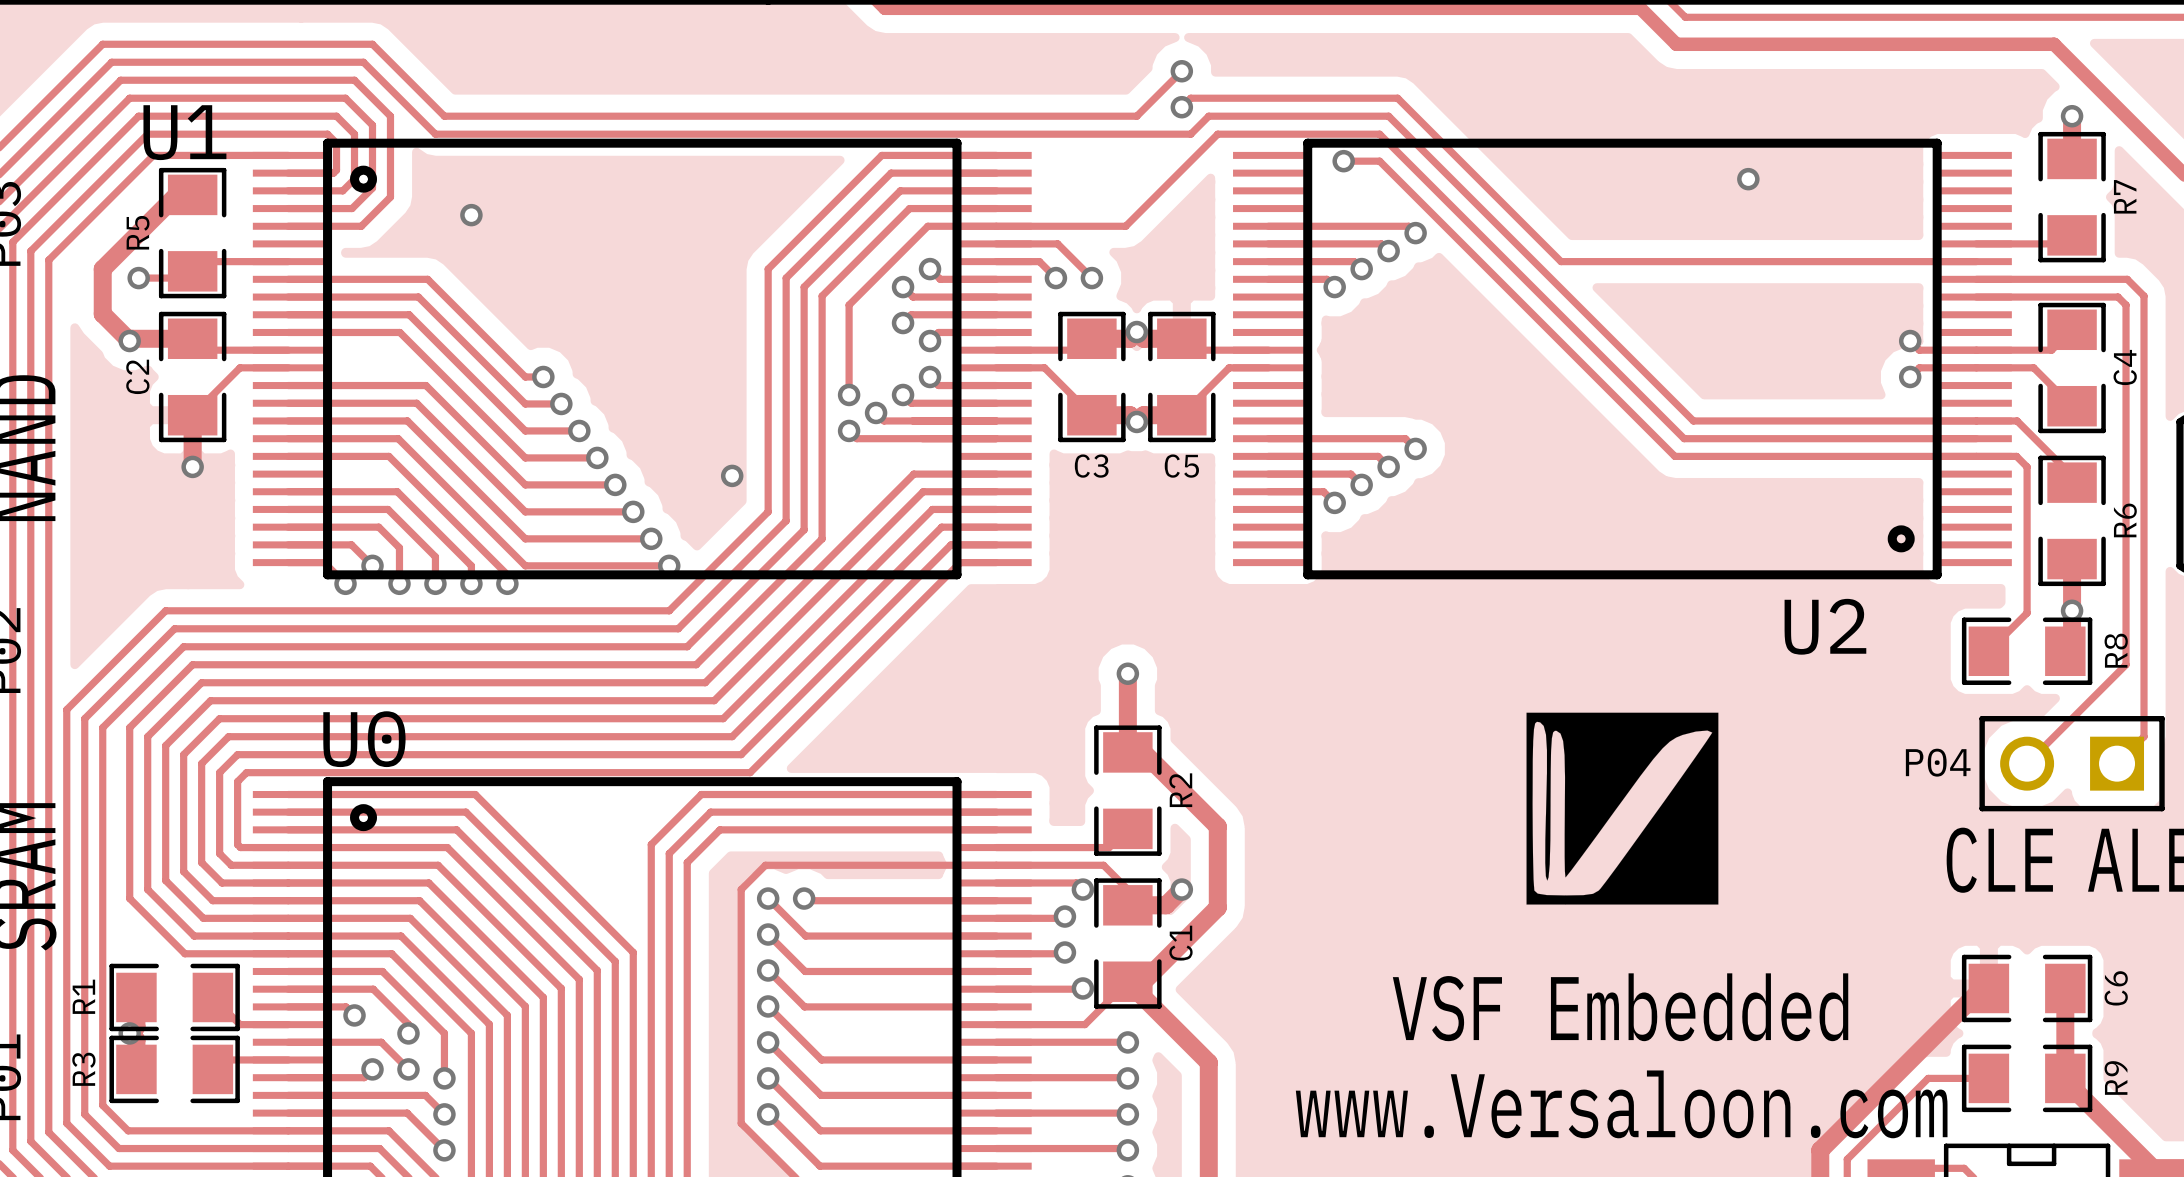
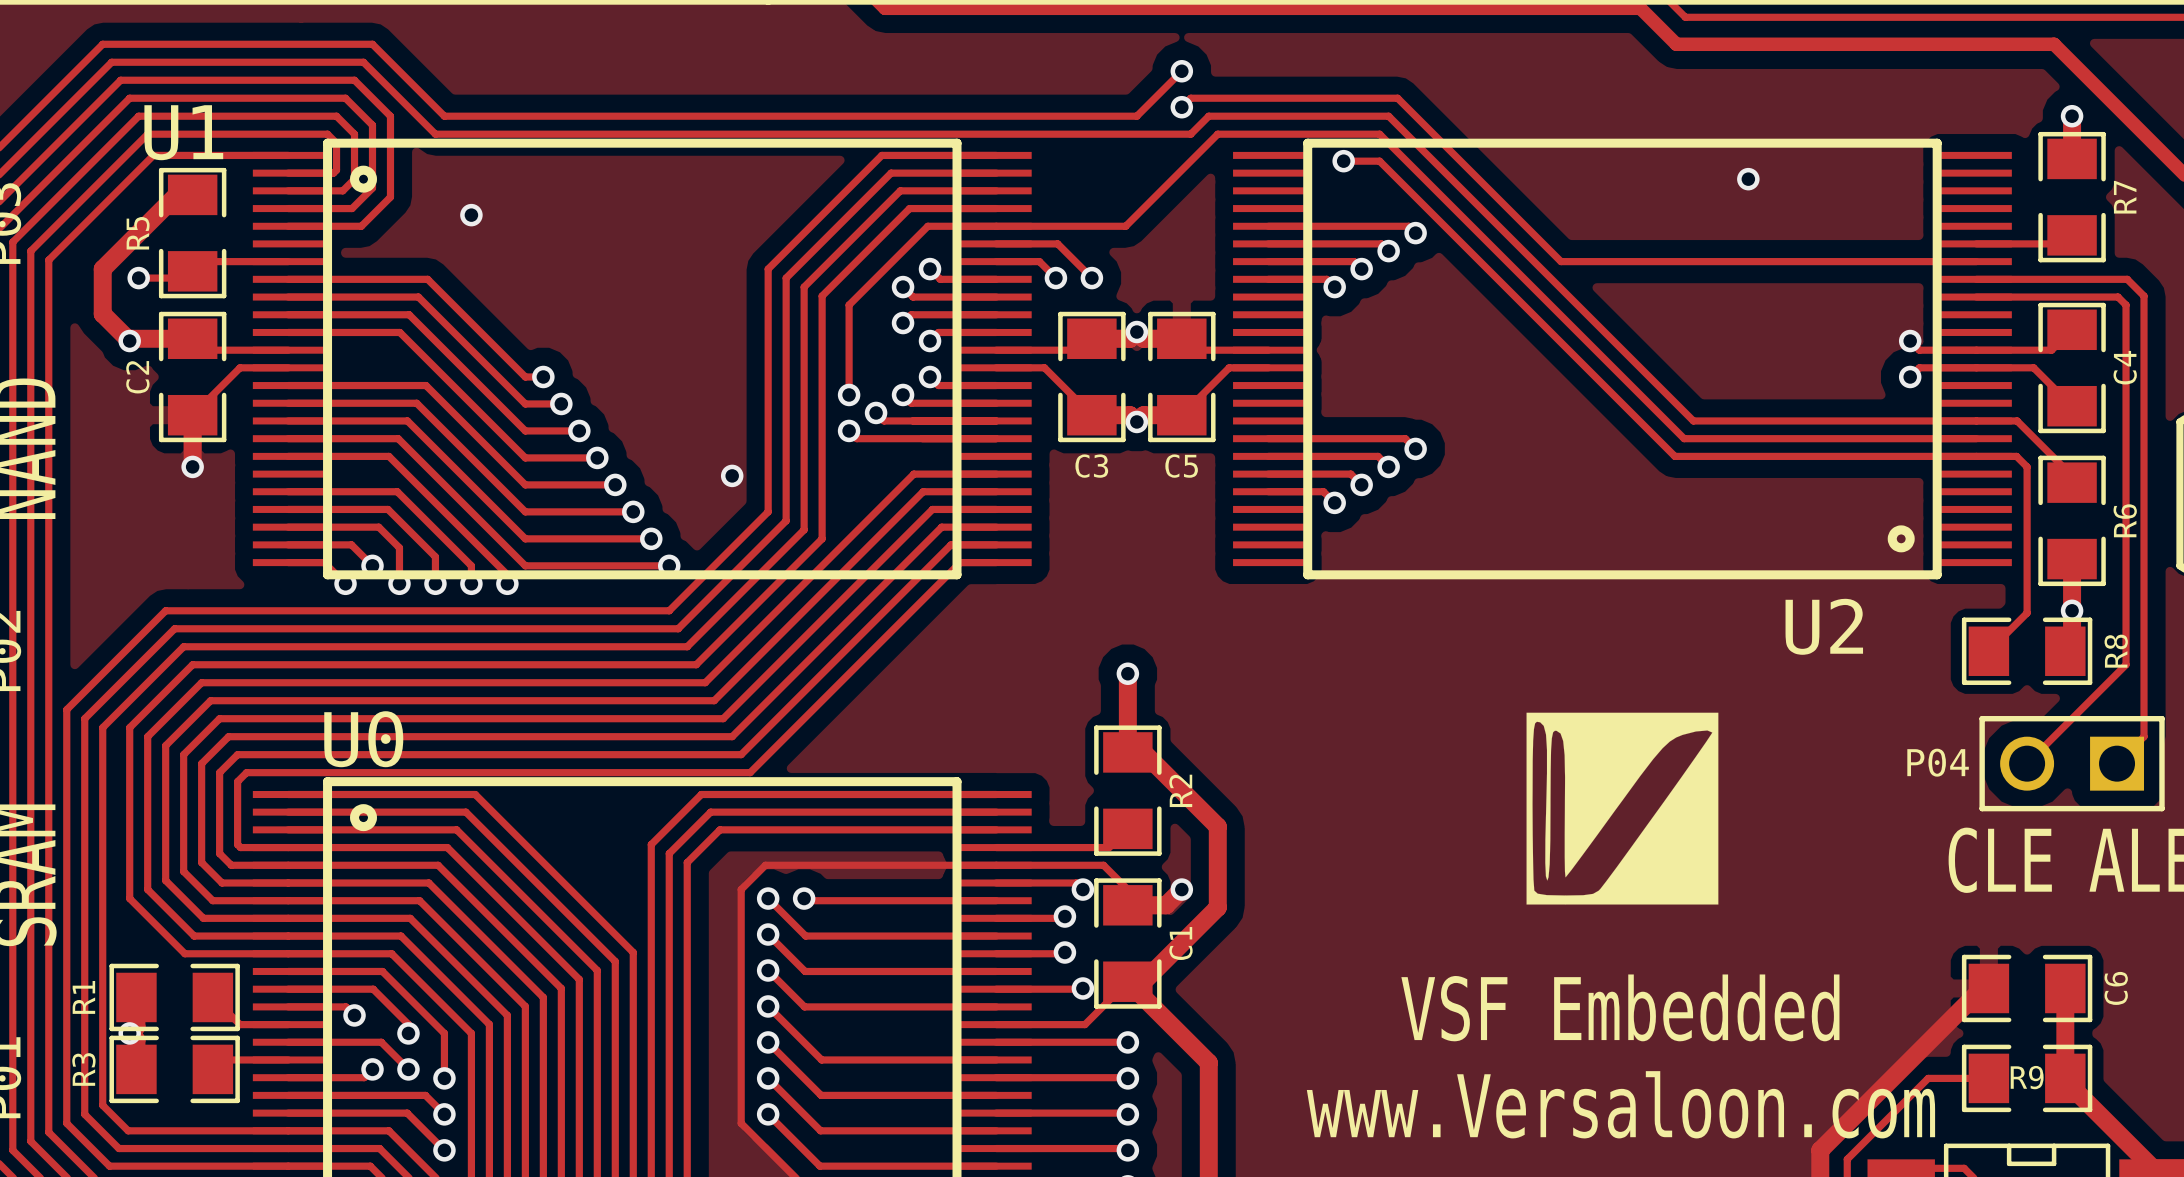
R9 name rotation: 0° (2116, 1077) -> 90° clockwise (2027, 1077)
R9 name position: R9 (2116, 1077) -> R9 (2027, 1077)

